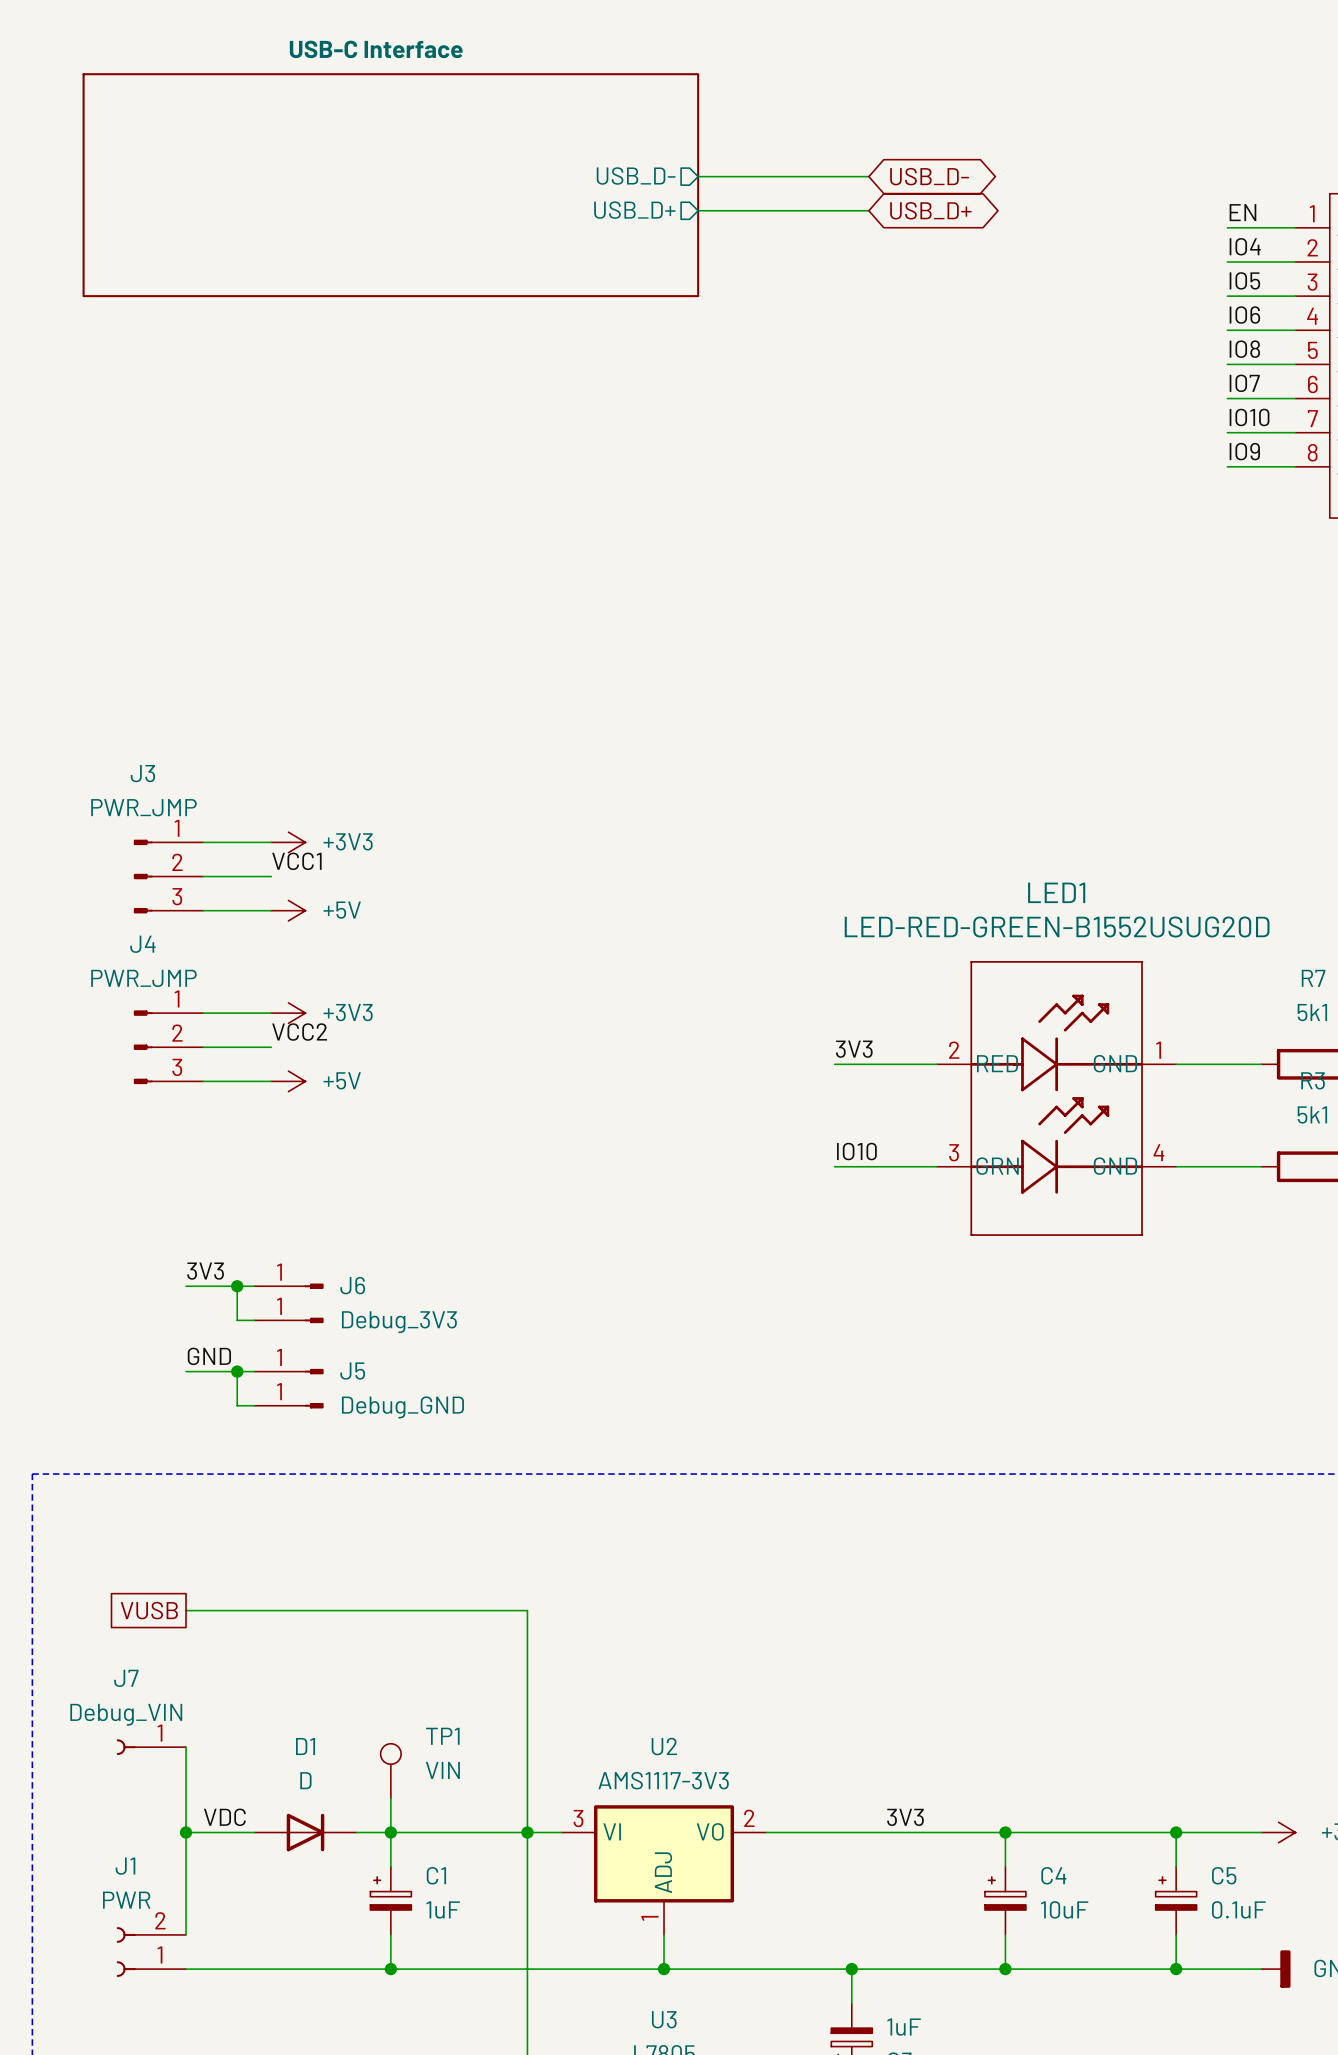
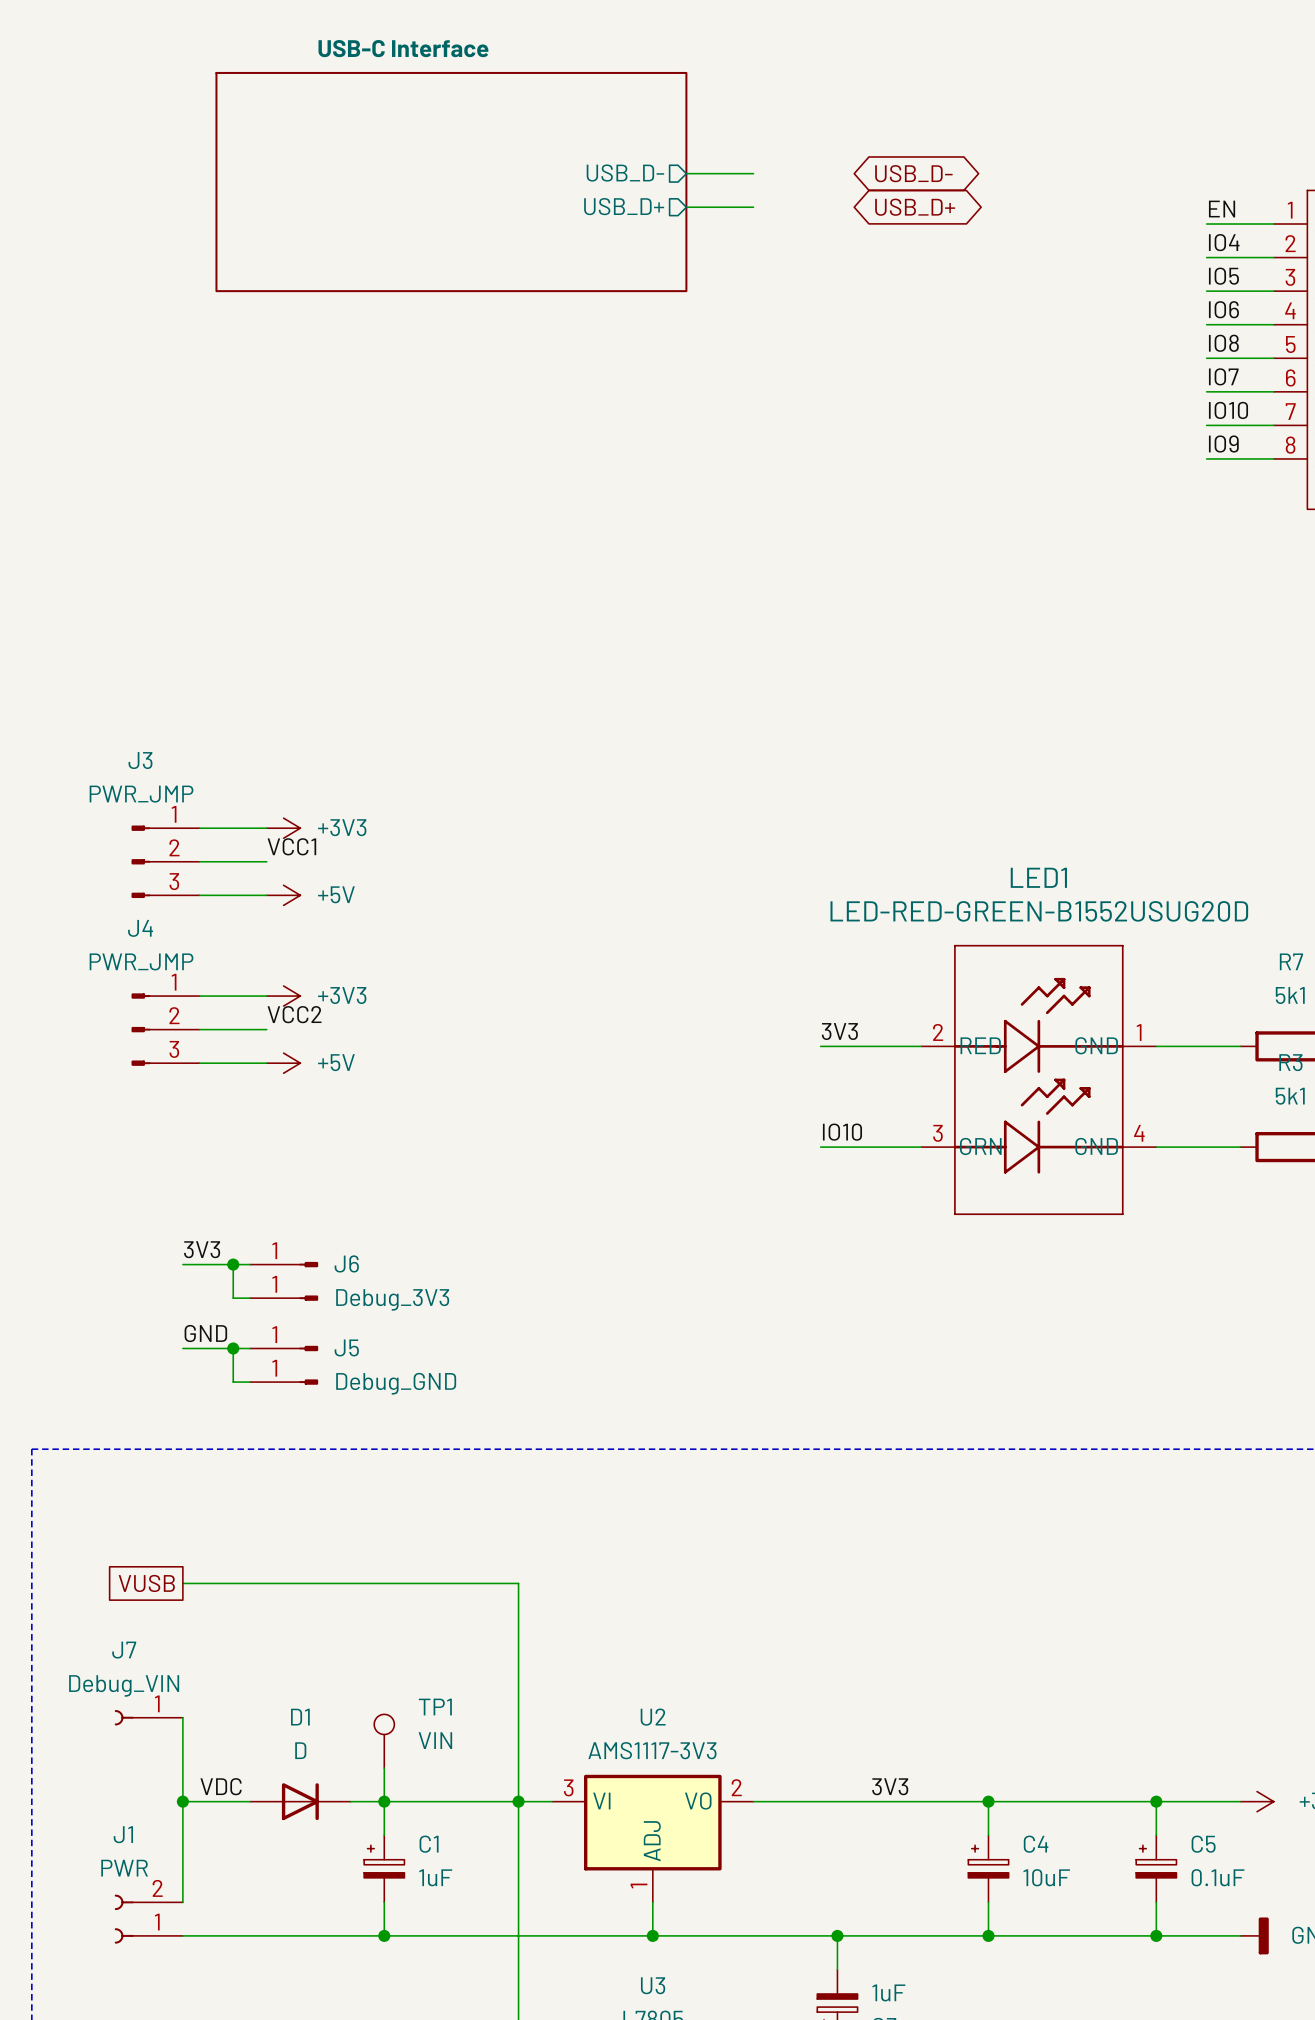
wire: (766, 176) (868, 176) -> none
sheet USB-C Interface: (390, 185) -> none
sheet USB-C Interface: none -> (451, 182)
wire: (766, 210) (868, 210) -> none

